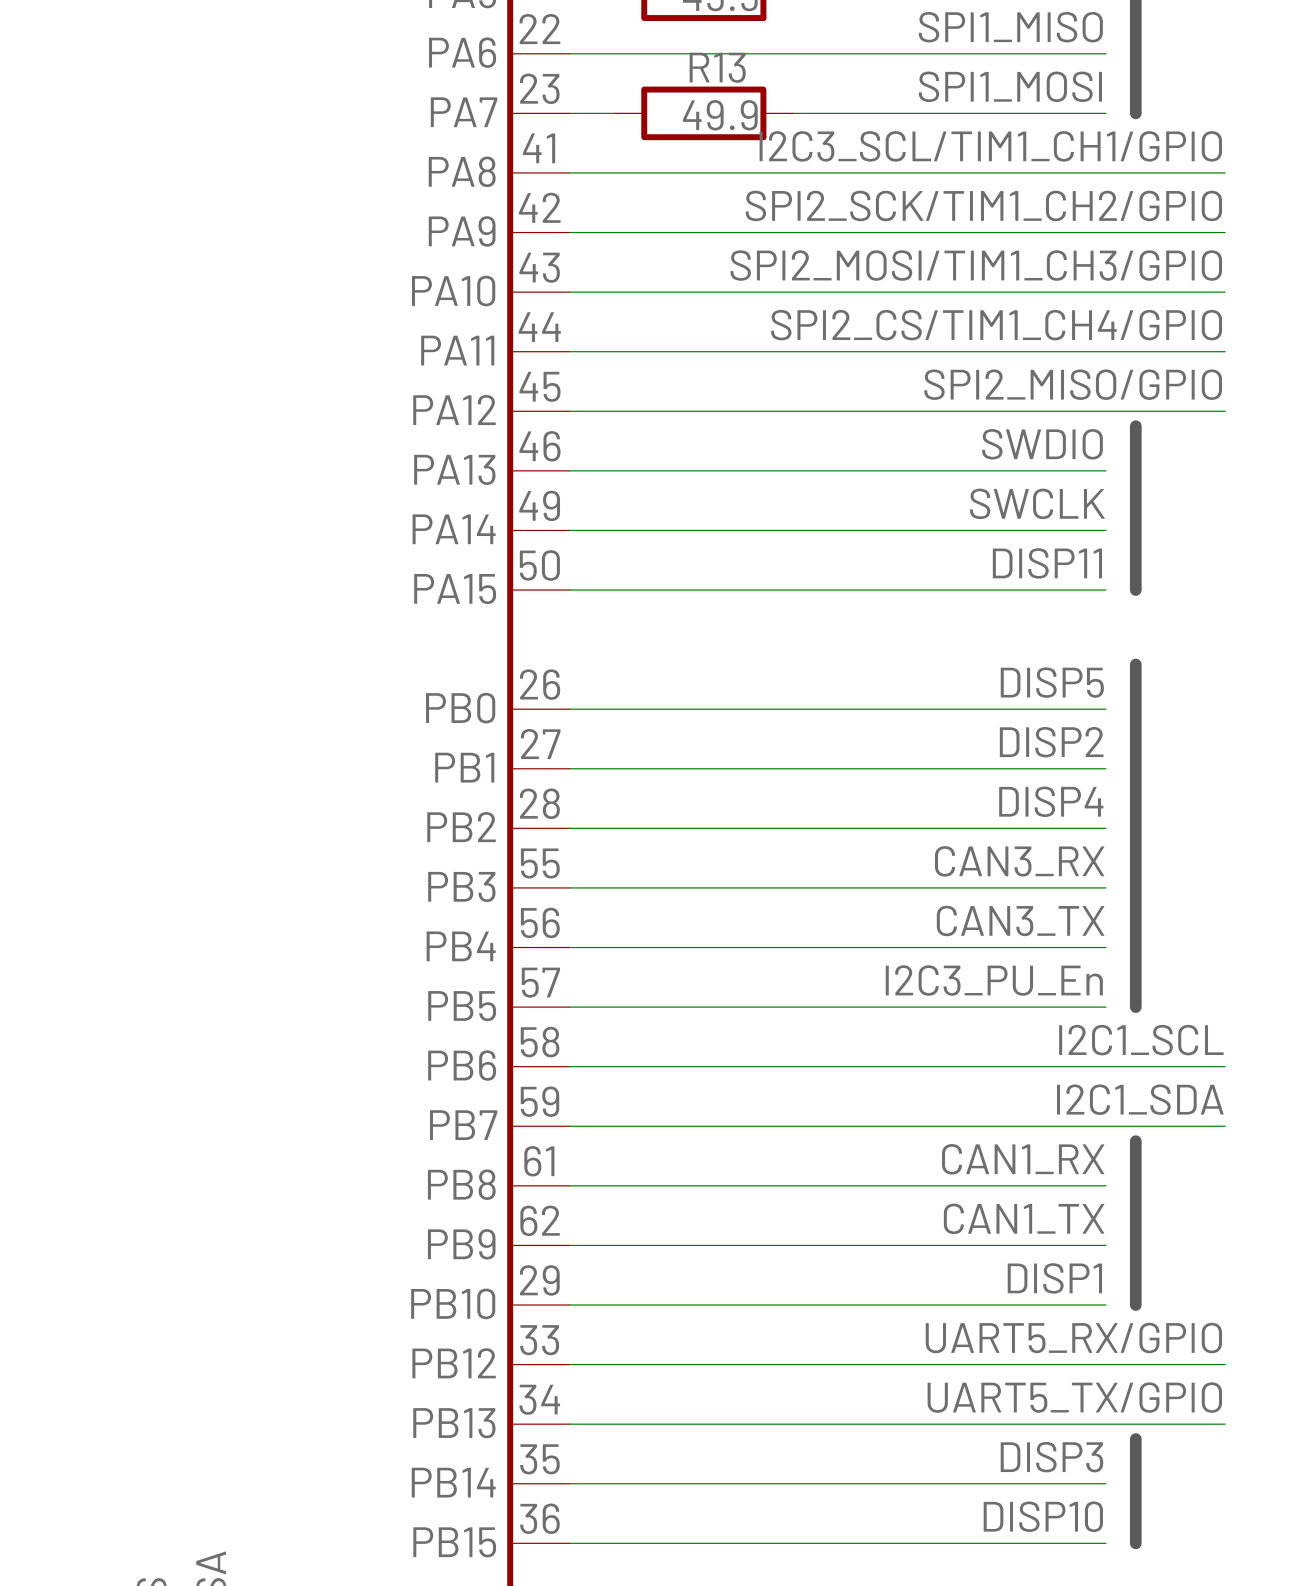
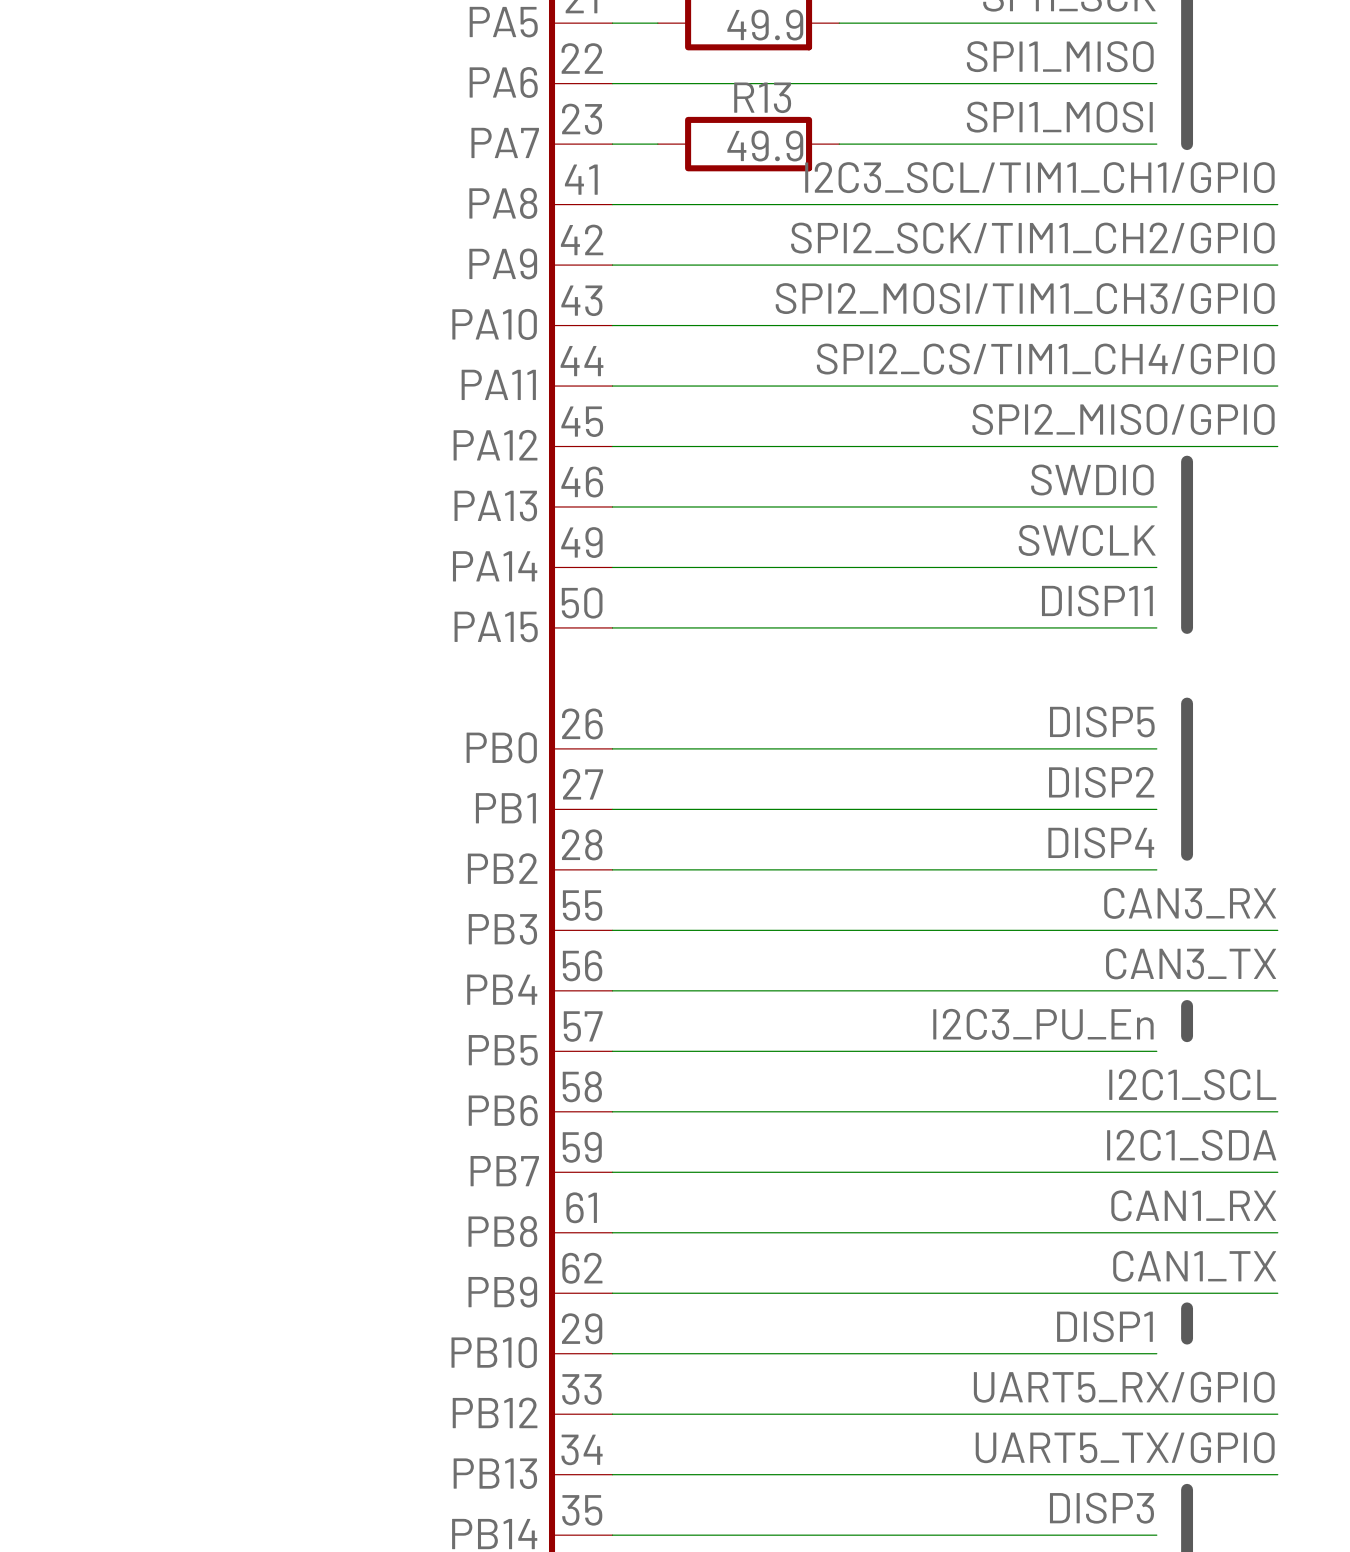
line: (1135, 813) (1135, 962) -> none
label position: CAN3_RX (1019, 861) -> CAN3_RX (1190, 903)
wire: none -> (1156, 930) (1277, 930)
label position: CAN3_TX (1020, 920) -> CAN3_TX (1191, 963)
wire: none -> (1156, 990) (1277, 990)
line: (1135, 992) (1135, 1007) -> none
line: (1135, 1141) (1135, 1260) -> none
label position: CAN1_RX (1023, 1159) -> CAN1_RX (1193, 1205)
wire: none -> (1156, 1232) (1277, 1232)
label position: CAN1_TX (1024, 1218) -> CAN1_TX (1194, 1266)
wire: none -> (1156, 1293) (1277, 1293)
line: (1135, 1290) (1135, 1305) -> none

